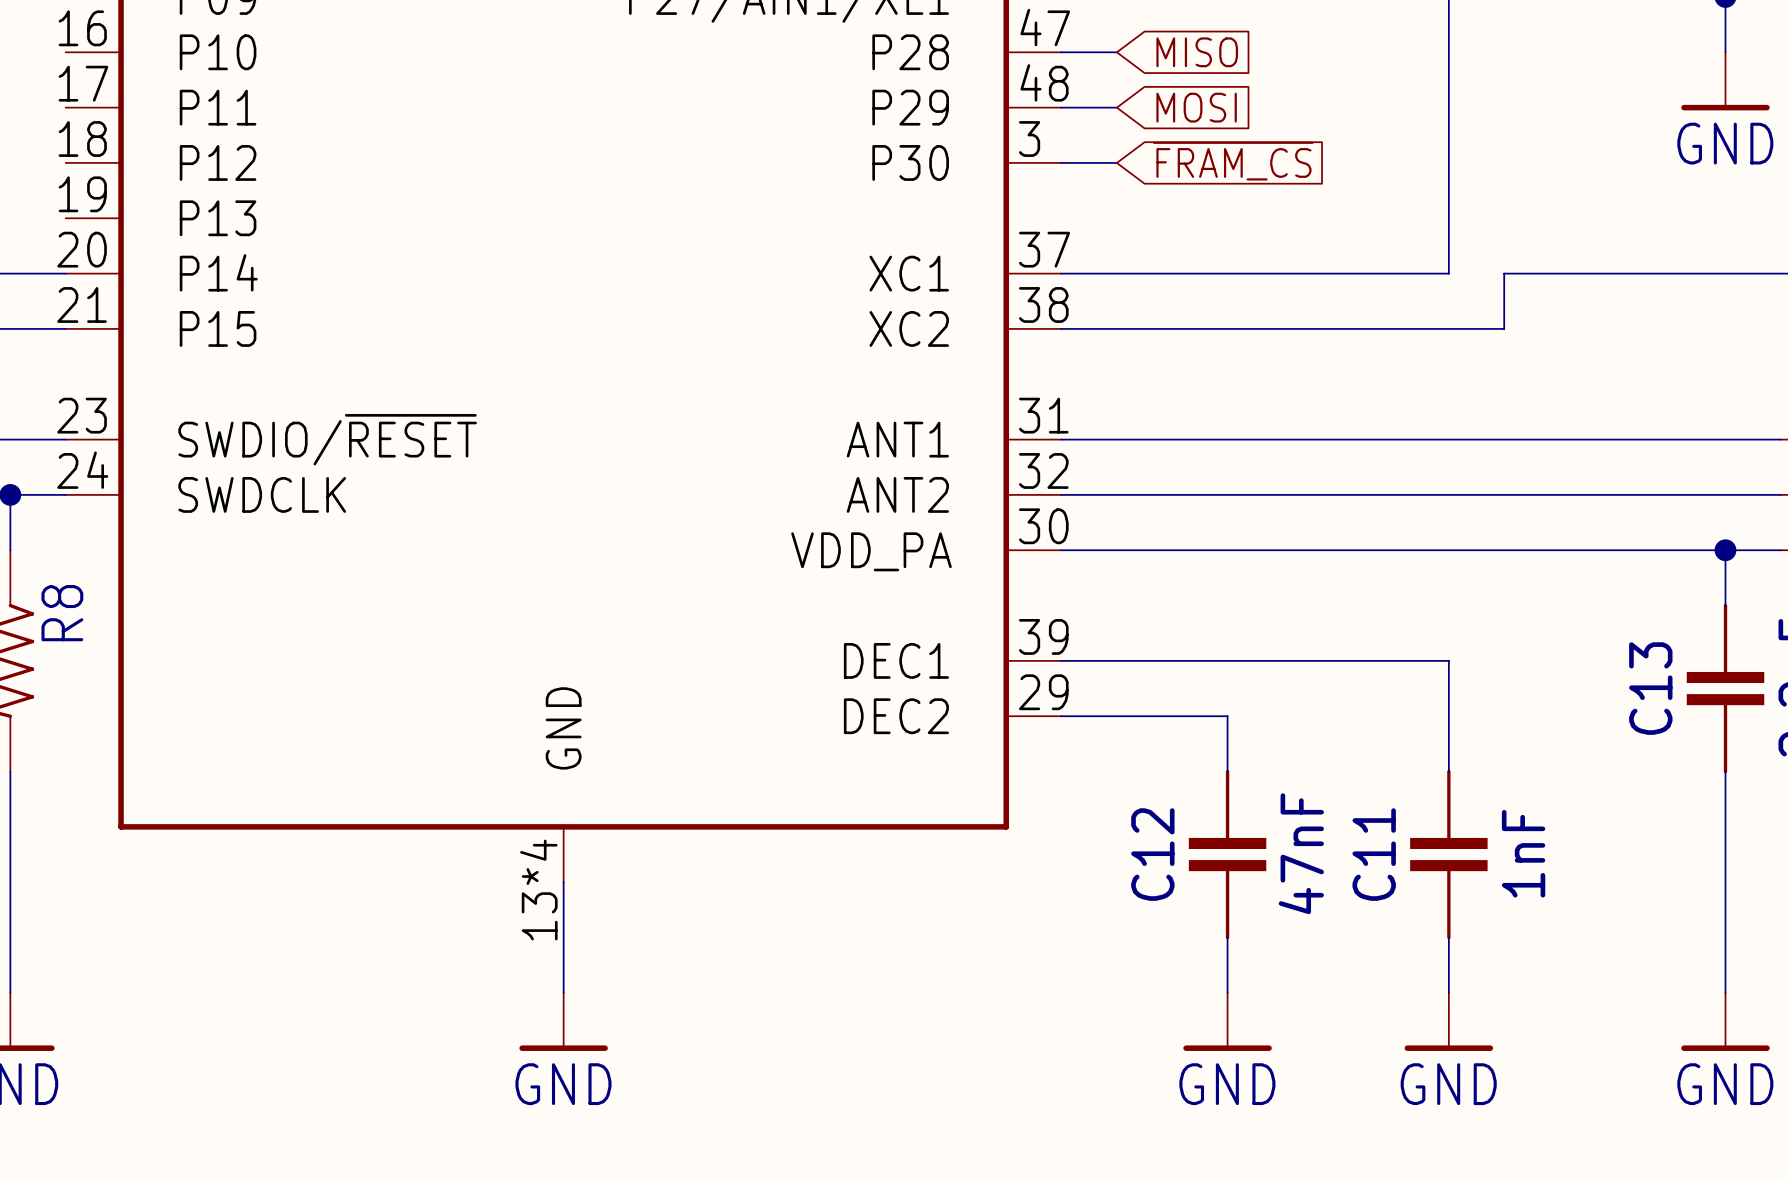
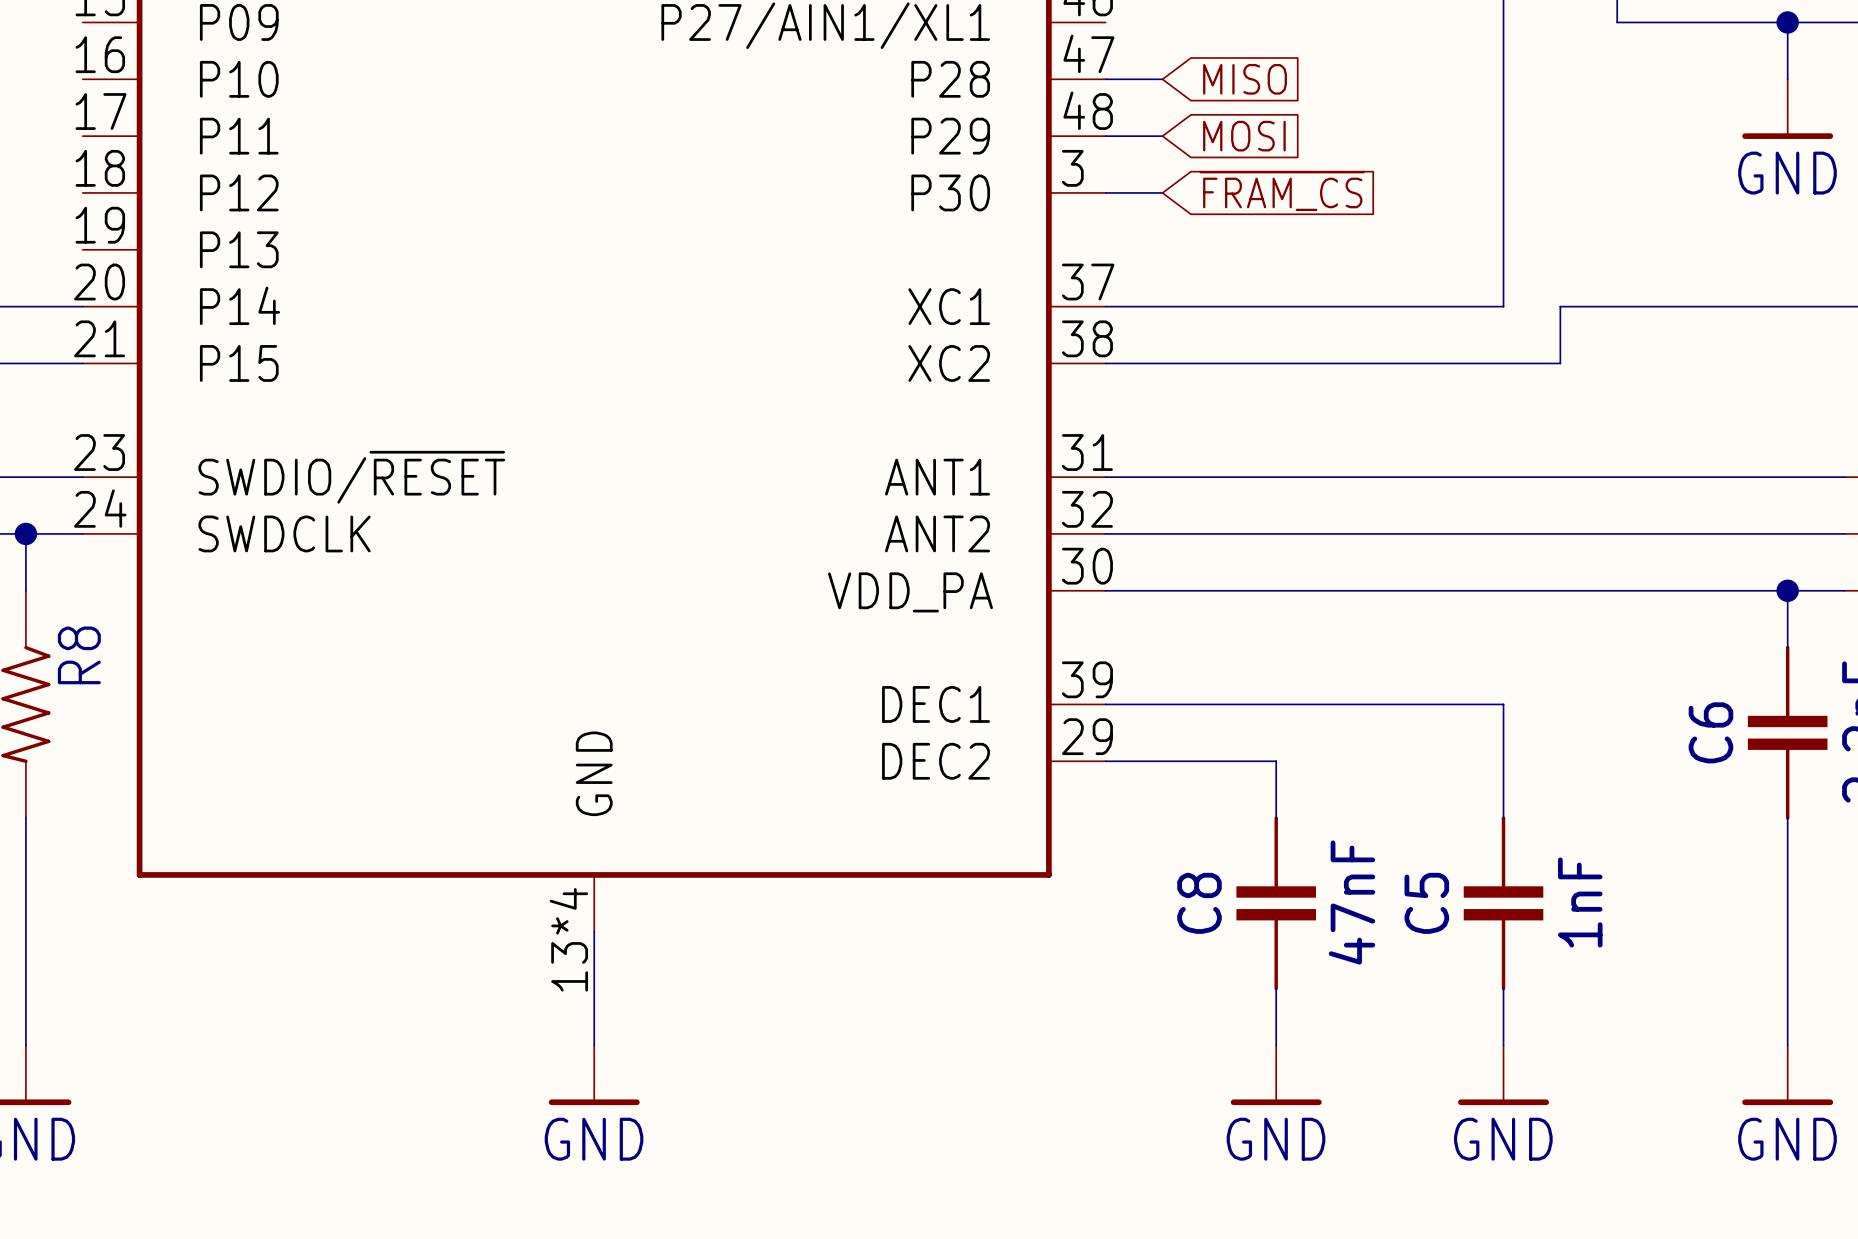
C13 name: C13 (1650, 688) -> C6 (1710, 732)
C12 name: C12 (1152, 854) -> C8 (1199, 903)
C11 name: C11 (1374, 854) -> C5 (1426, 903)

